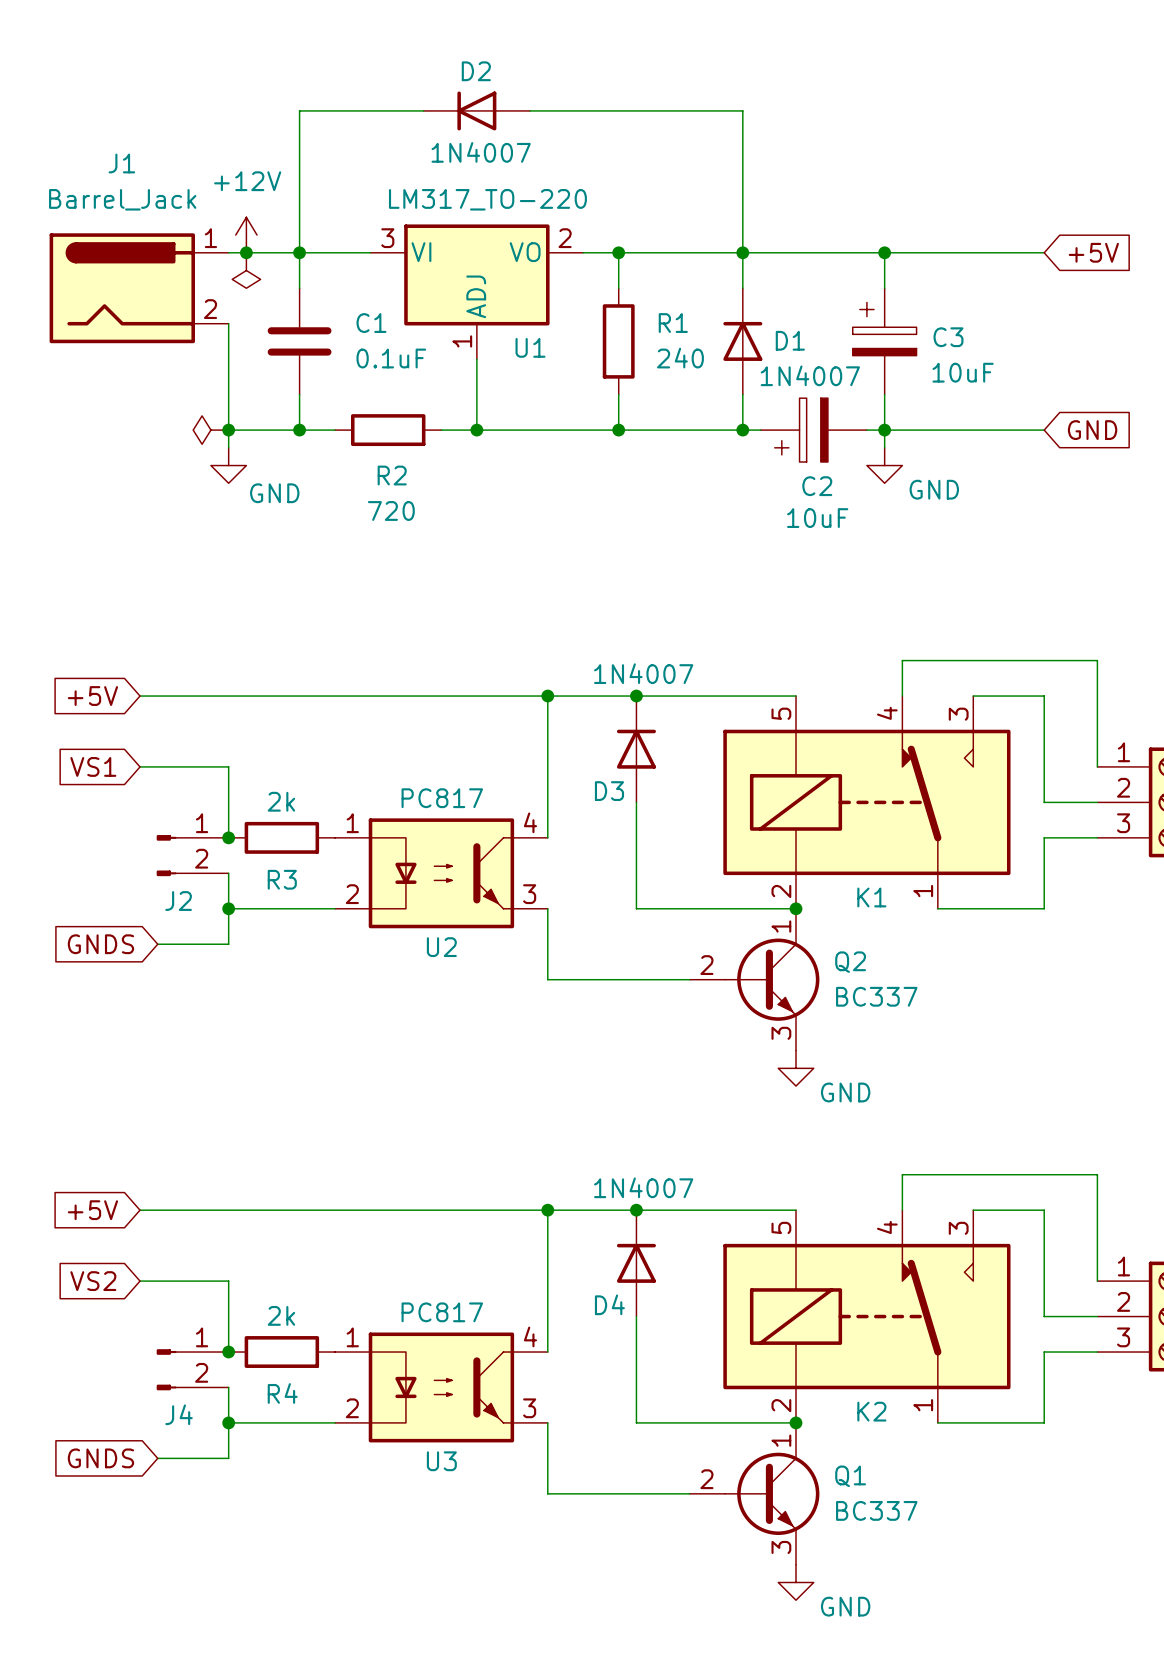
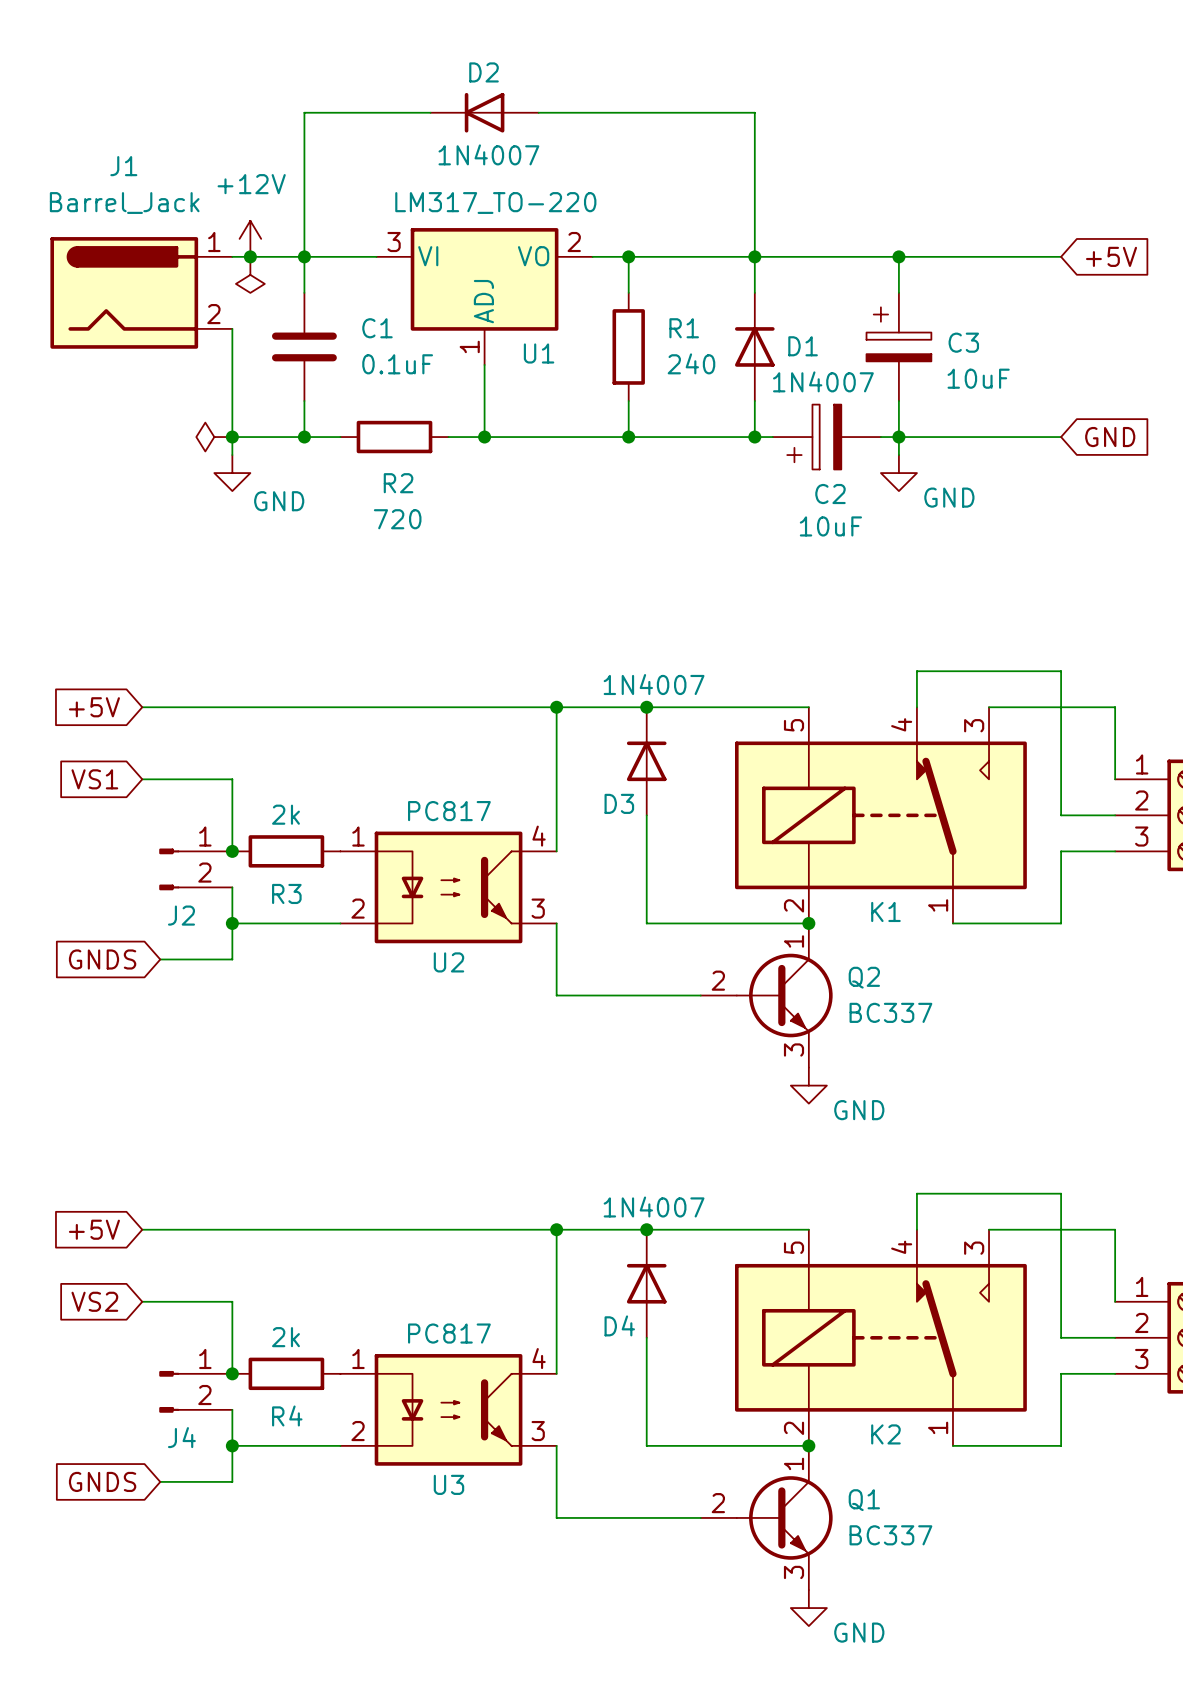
wire: (1044, 660) (1097, 660) (1097, 696) -> (1061, 671) (1061, 707) (1115, 707)
wire: (1044, 1174) (1097, 1174) (1097, 1210) -> (1061, 1193) (1061, 1229) (1115, 1229)

